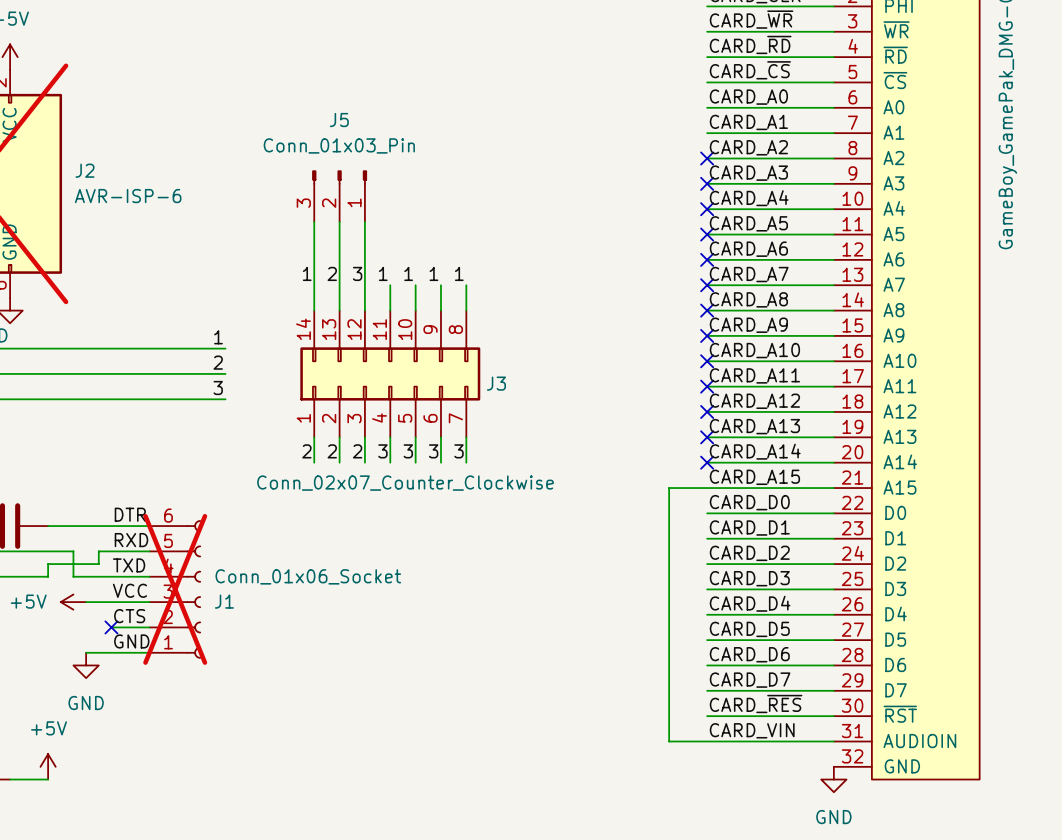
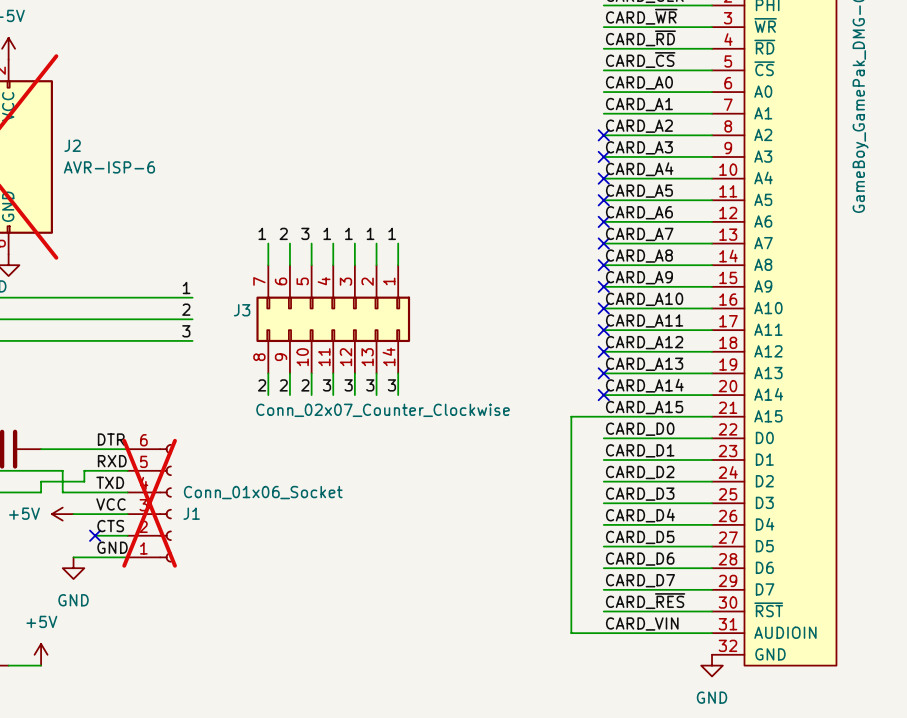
J5: Conn_01x03_Pin (339, 196) -> none
wire: (314, 221) (314, 285) -> none
wire: (339, 221) (339, 285) -> none
wire: (364, 221) (364, 285) -> none
J3 rotation: 0° (390, 373) -> 180° (333, 319)
J3 value position: Conn_02x07_Counter_Clockwise (405, 483) -> Conn_02x07_Counter_Clockwise (383, 410)

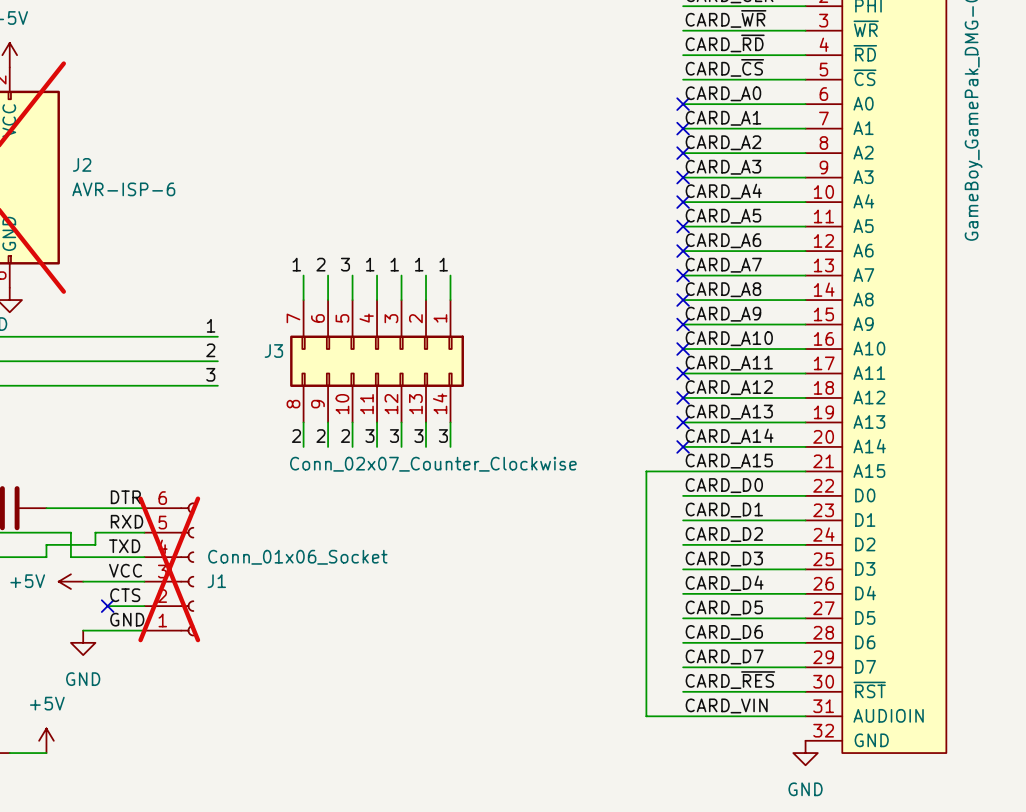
no-connect mark: none -> (683, 104)
no-connect mark: none -> (683, 128)

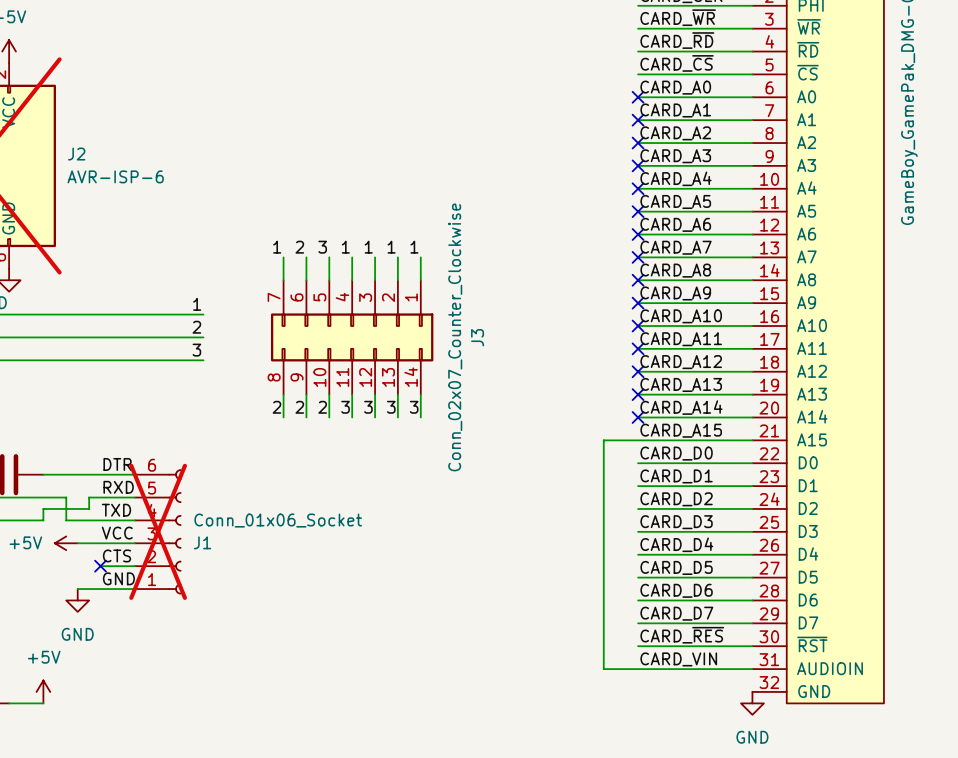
J3 name rotation: 0° (273, 351) -> 90° counterclockwise (477, 337)
J3 name position: J3 (273, 351) -> J3 (477, 337)
J3 value rotation: 0° (433, 464) -> 90° counterclockwise (455, 337)

